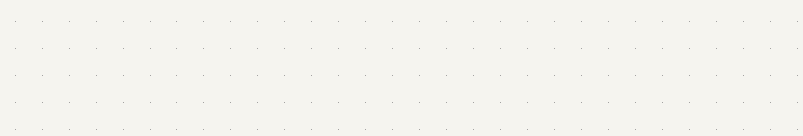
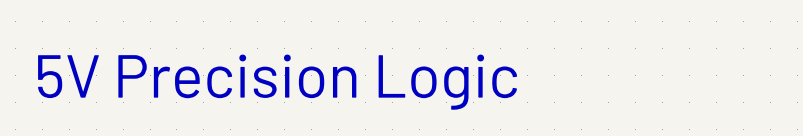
text: none -> 5V Precision Logic (277, 82)

